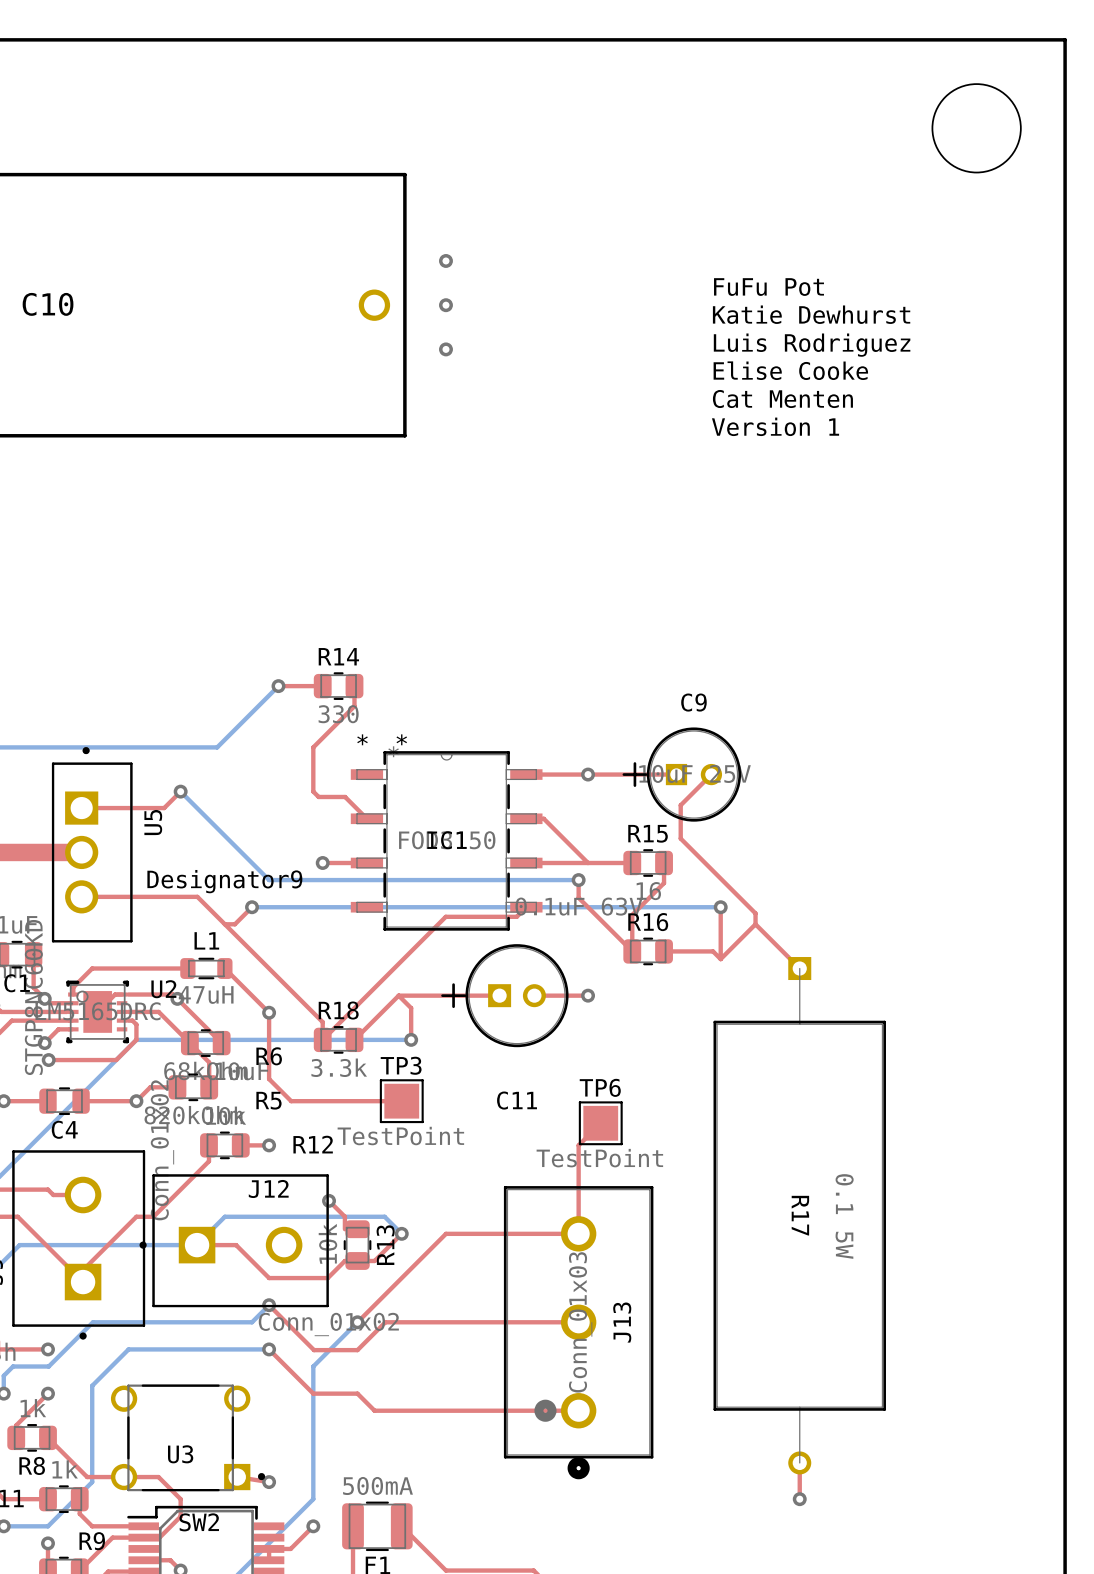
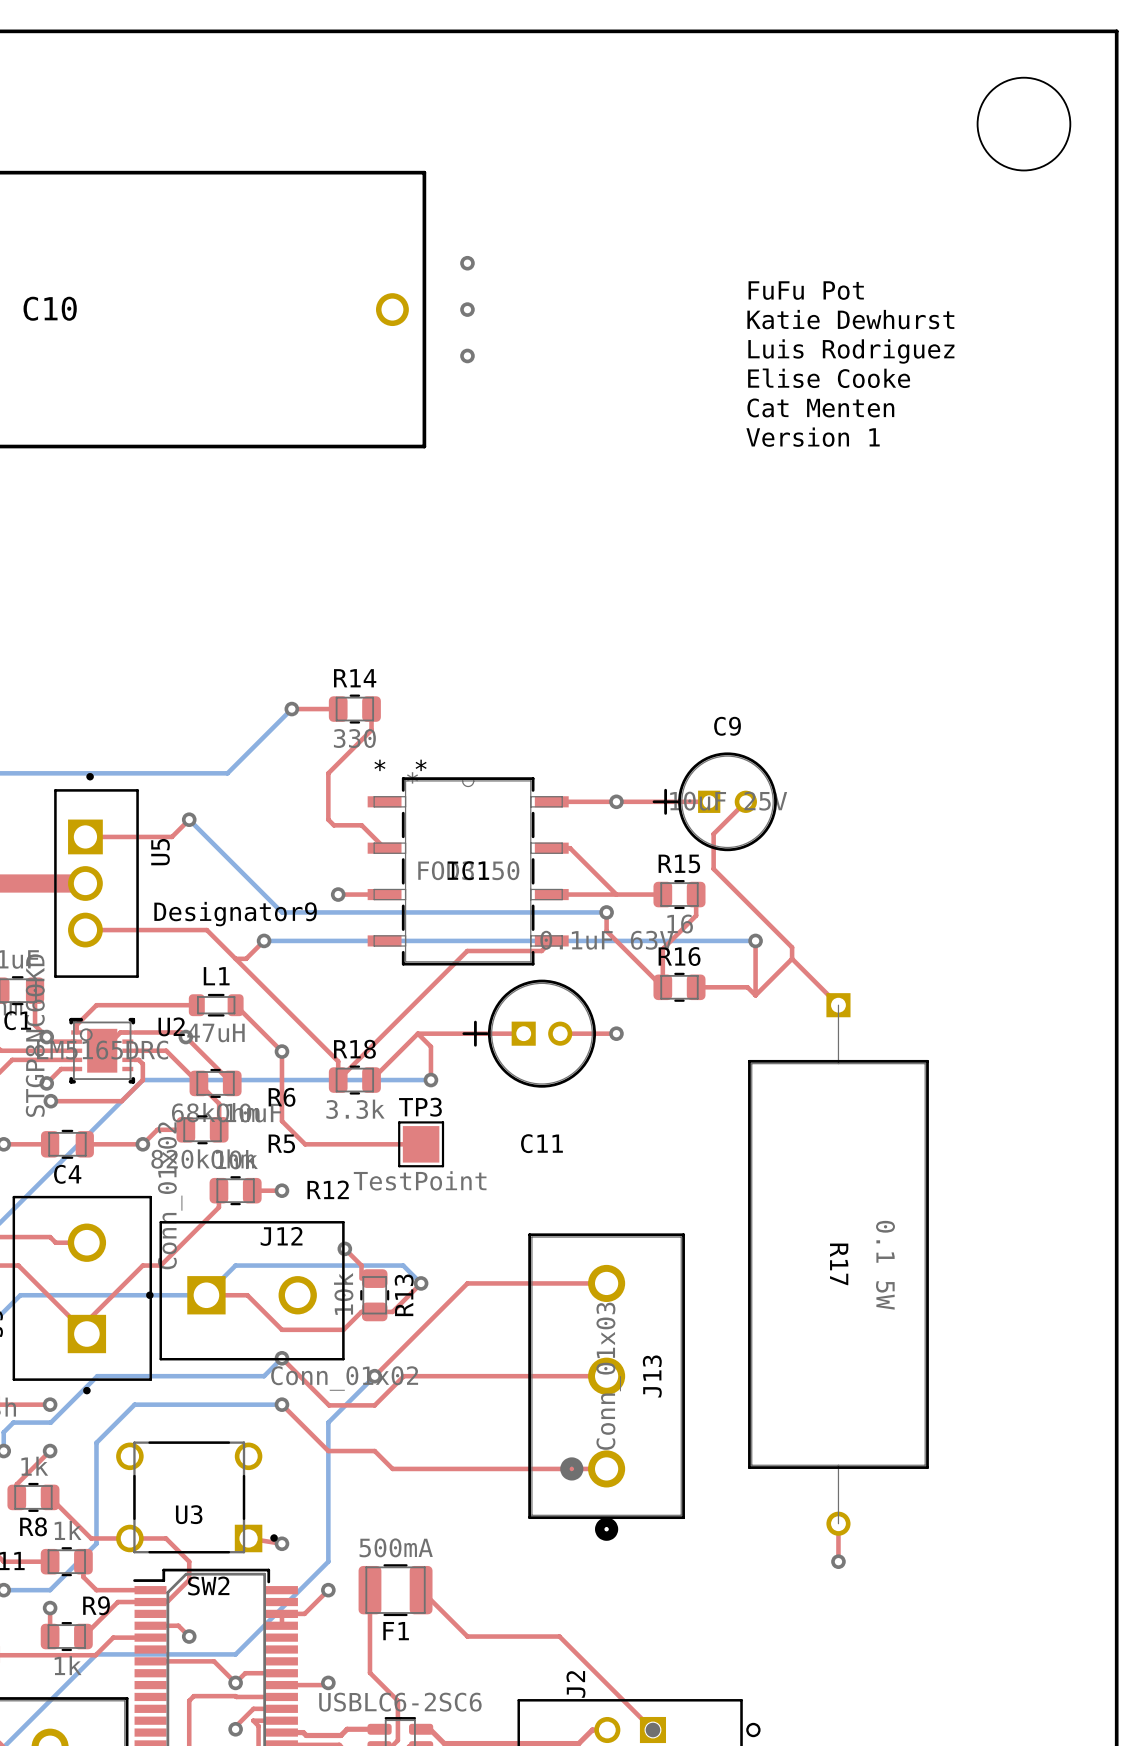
top track: (600, 1123) (578, 1145) (578, 1233) -> none
TP6: TestPoint (600, 1123) -> none

